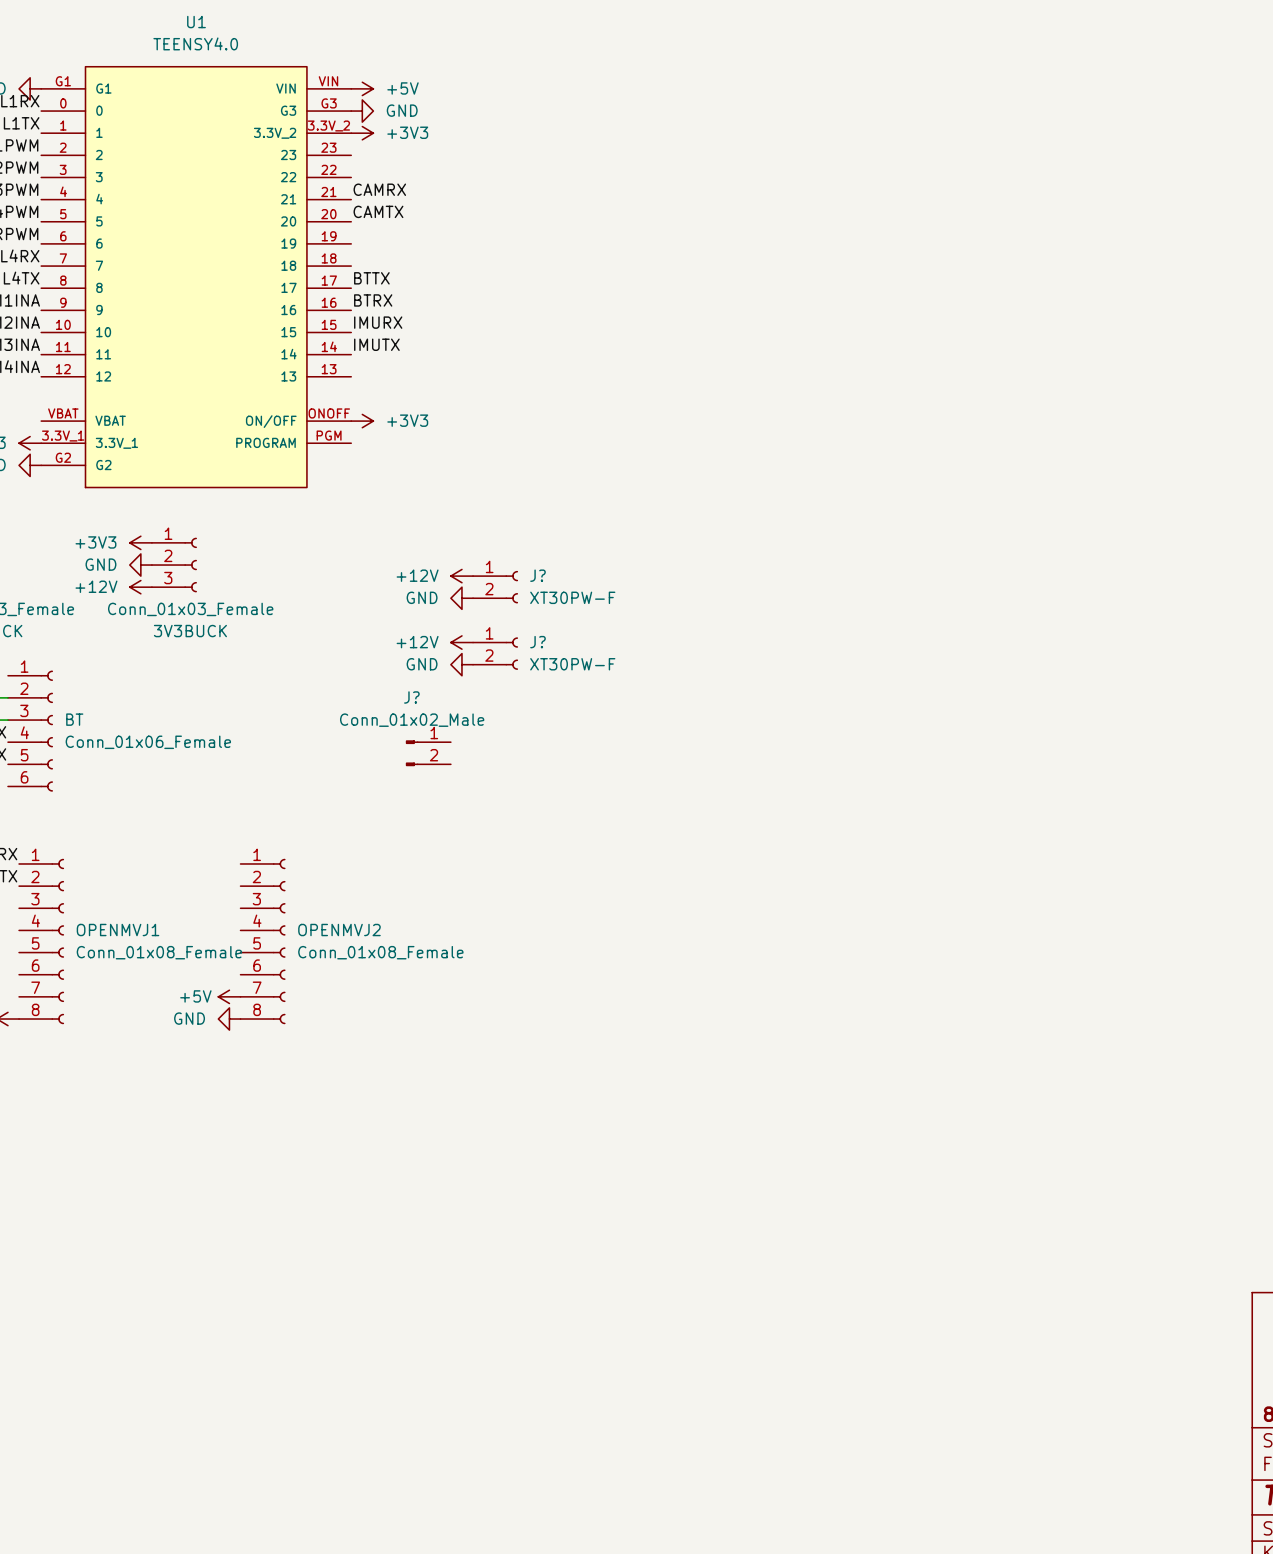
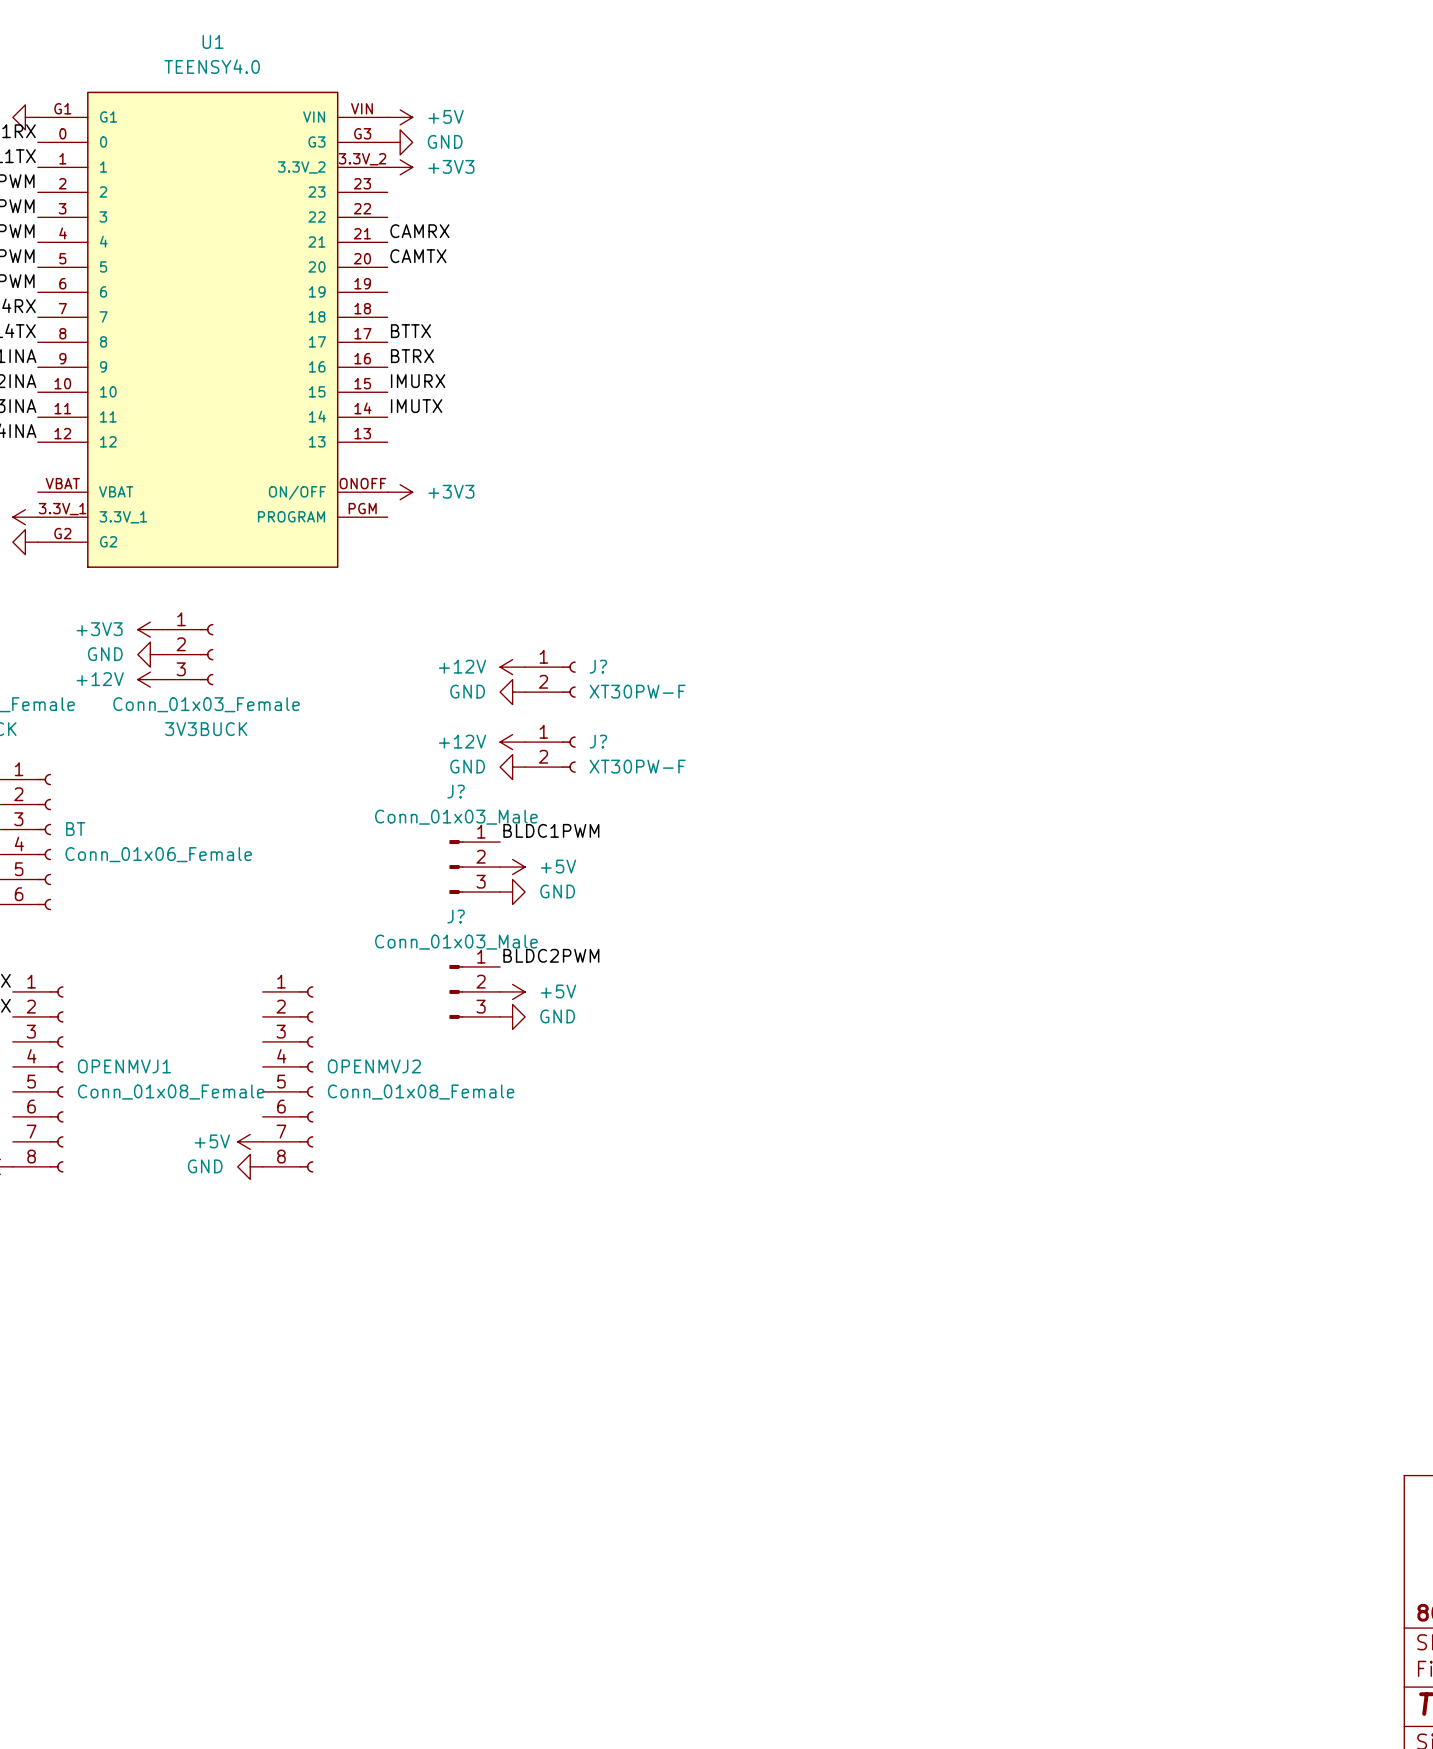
J? value: Conn_01x02_Male (412, 720) -> Conn_01x03_Male (456, 817)
label: none -> BLDC1PWM (551, 830)
J? symbol: [405, 740, 451, 767] -> [449, 840, 501, 895]
power symbol: none -> +5V (512, 867)
power symbol: none -> GND (512, 892)
label: none -> BLDC2PWM (551, 955)
J?: none -> Conn_01x03_Male (474, 991)
power symbol: none -> +5V (512, 991)
power symbol: none -> GND (512, 1016)

